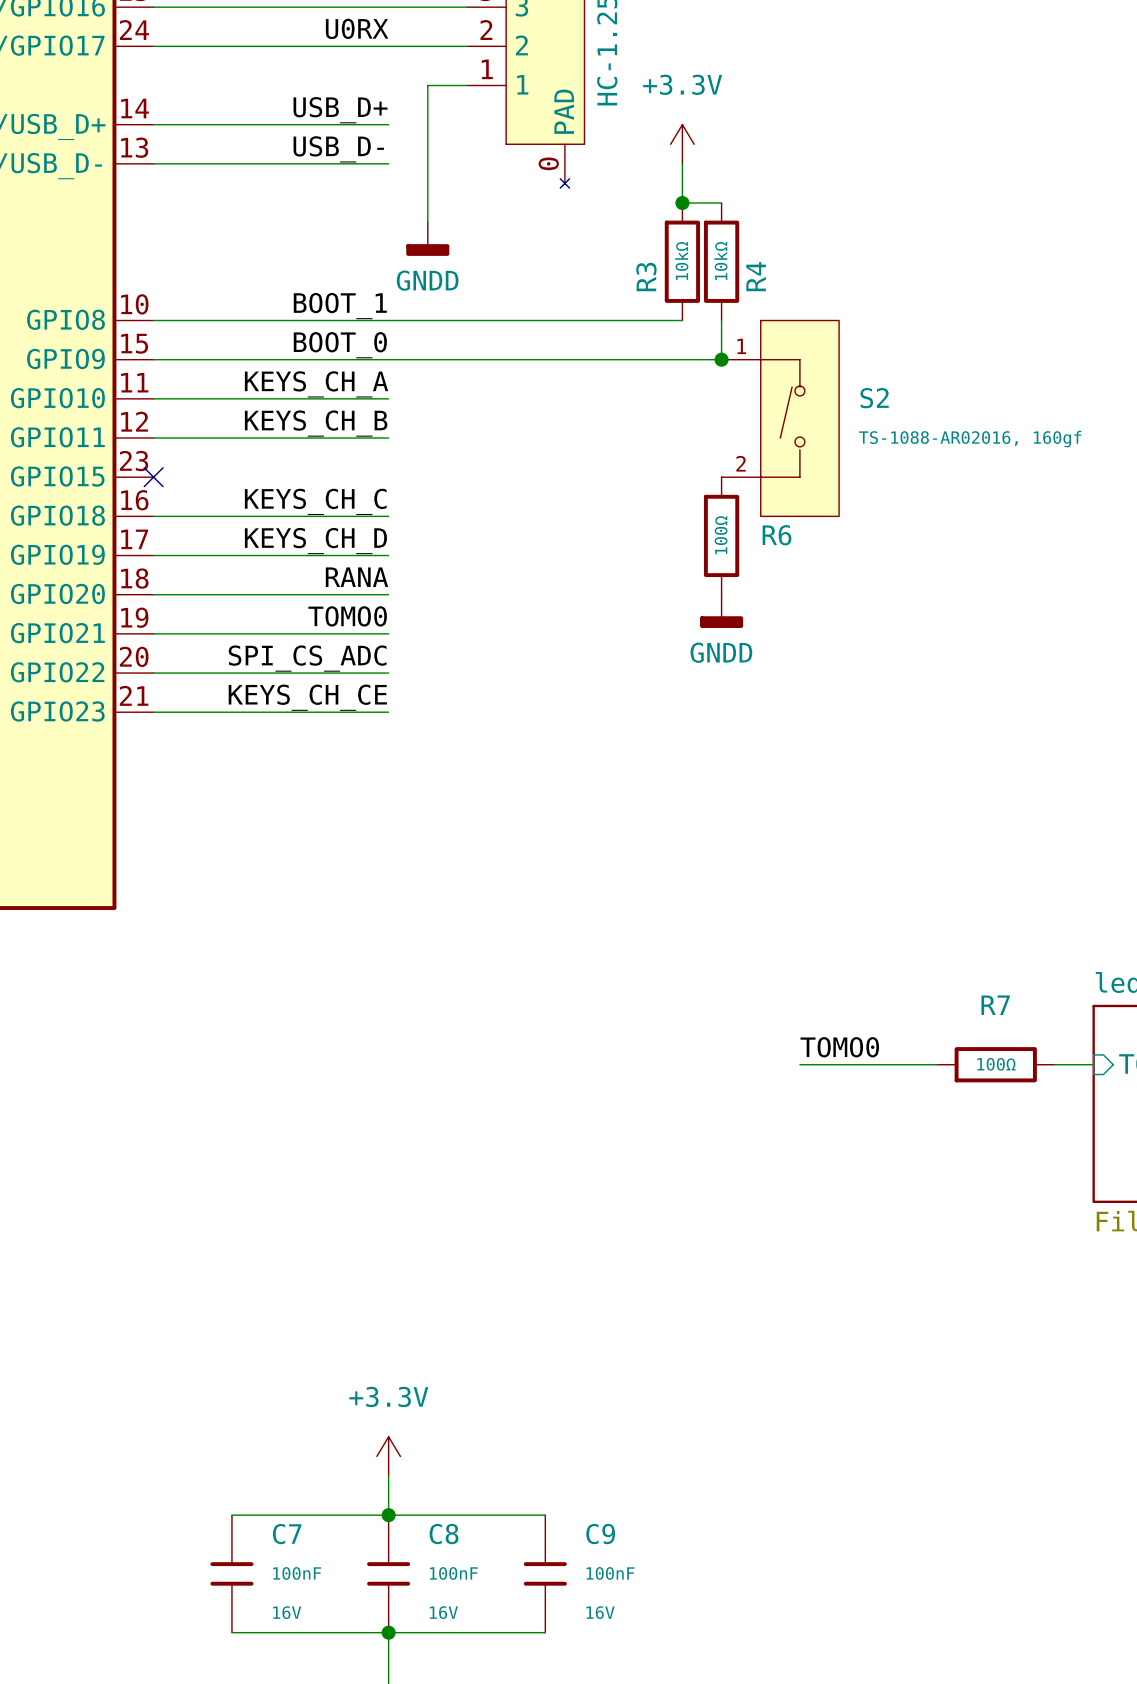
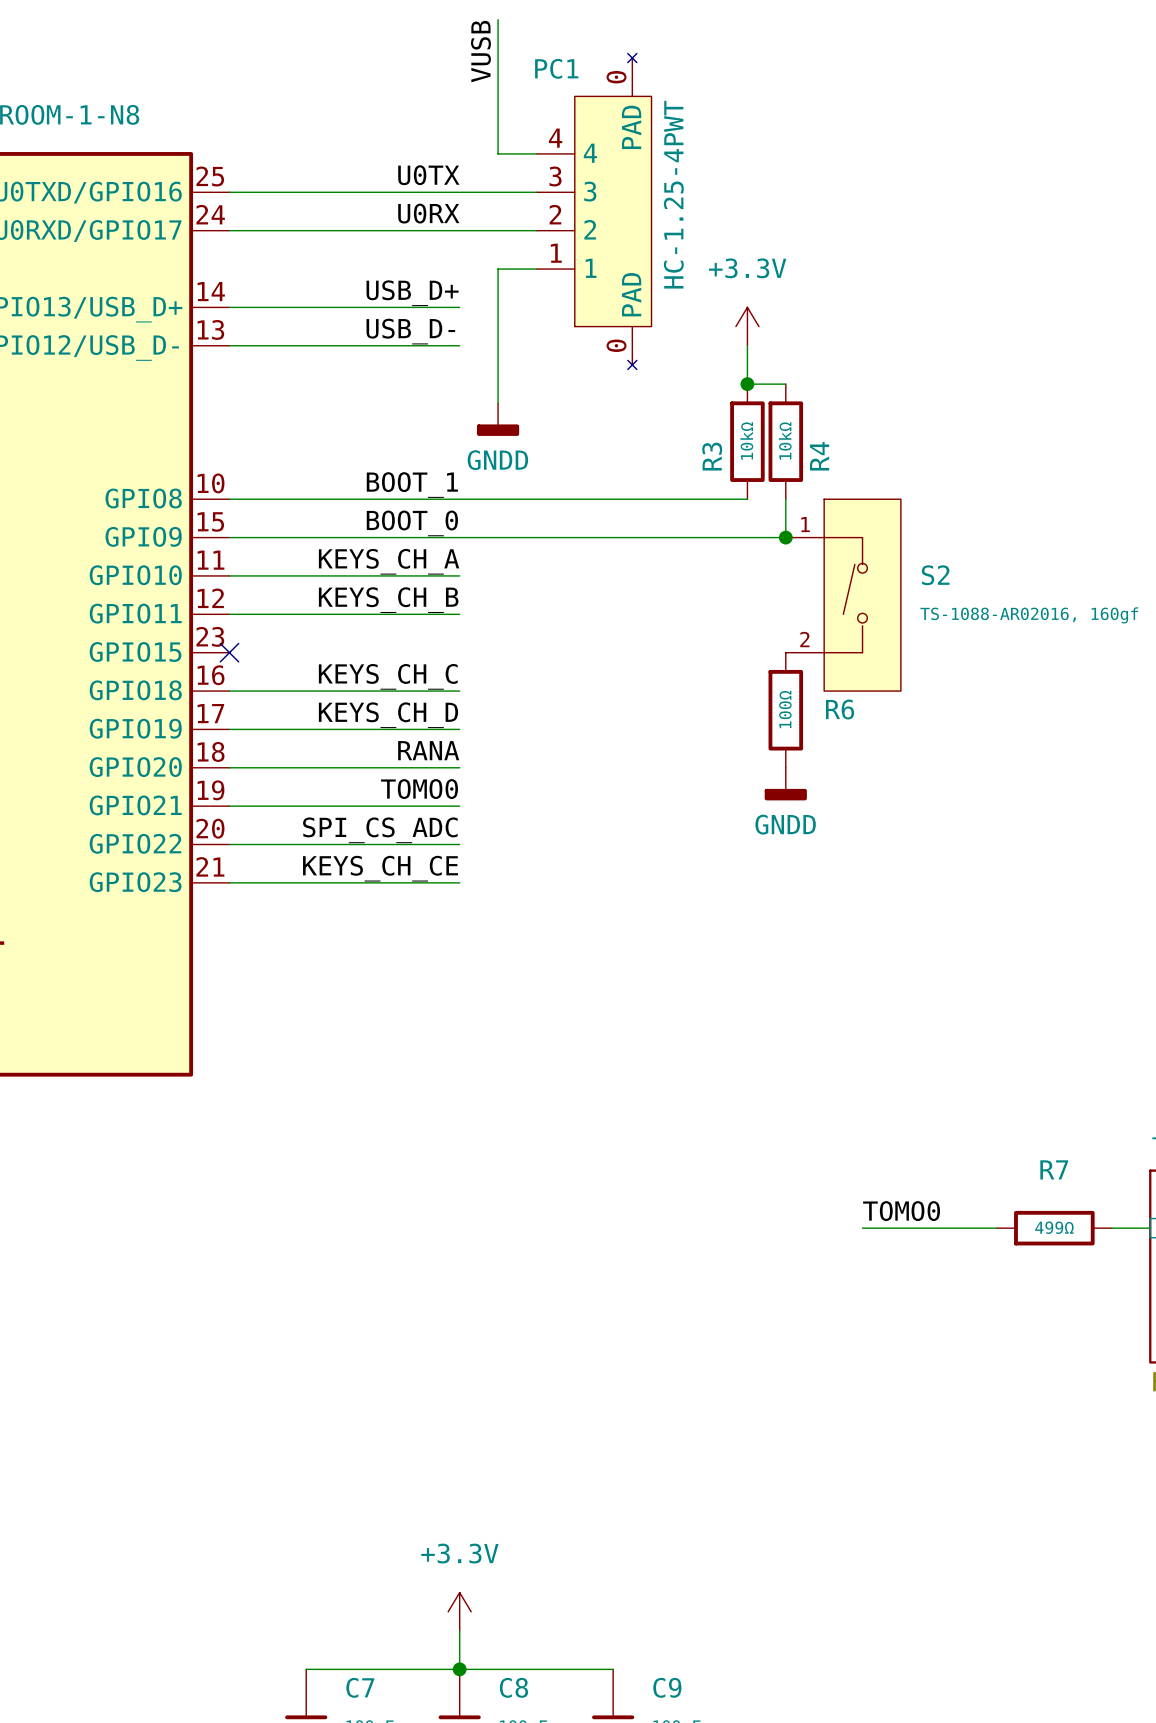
R7 value: 100Ω (996, 1064) -> 499Ω (1054, 1227)

